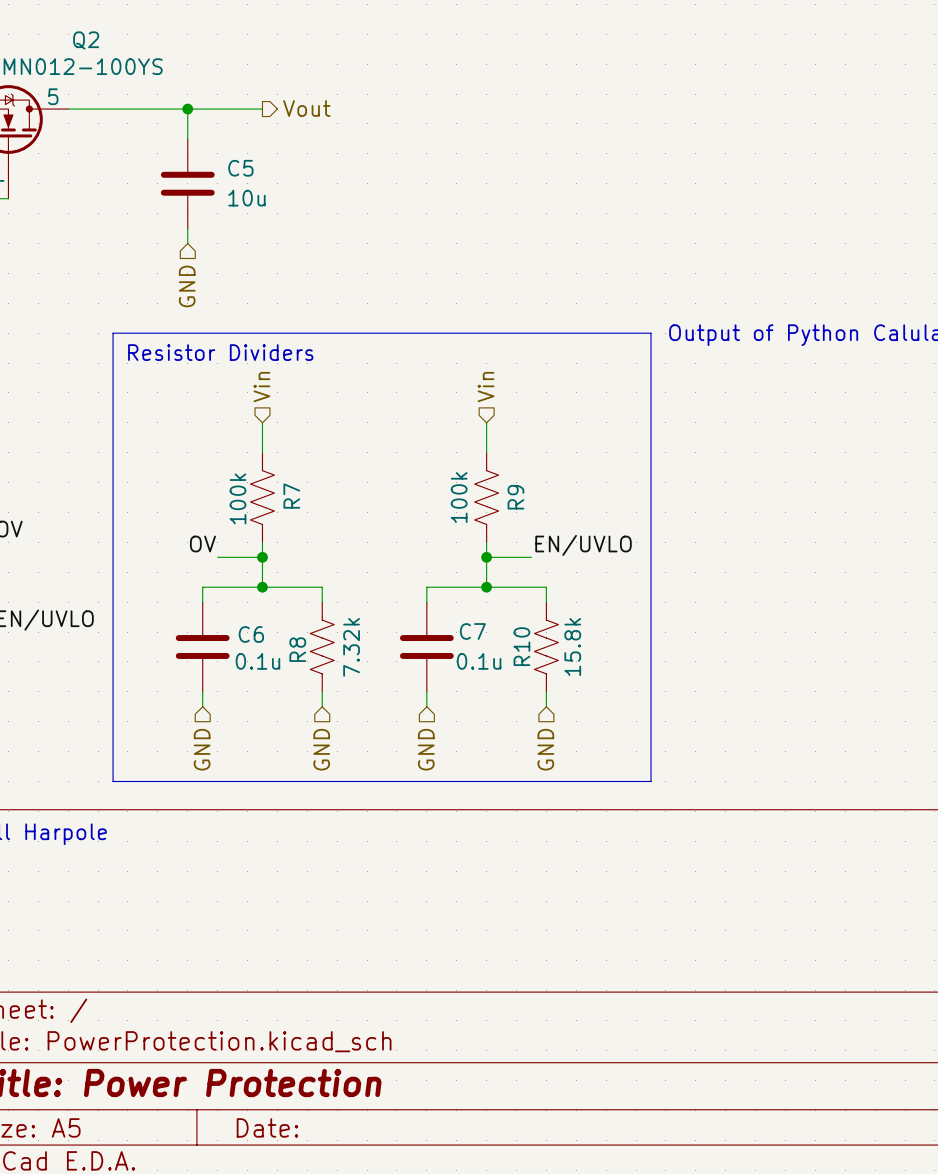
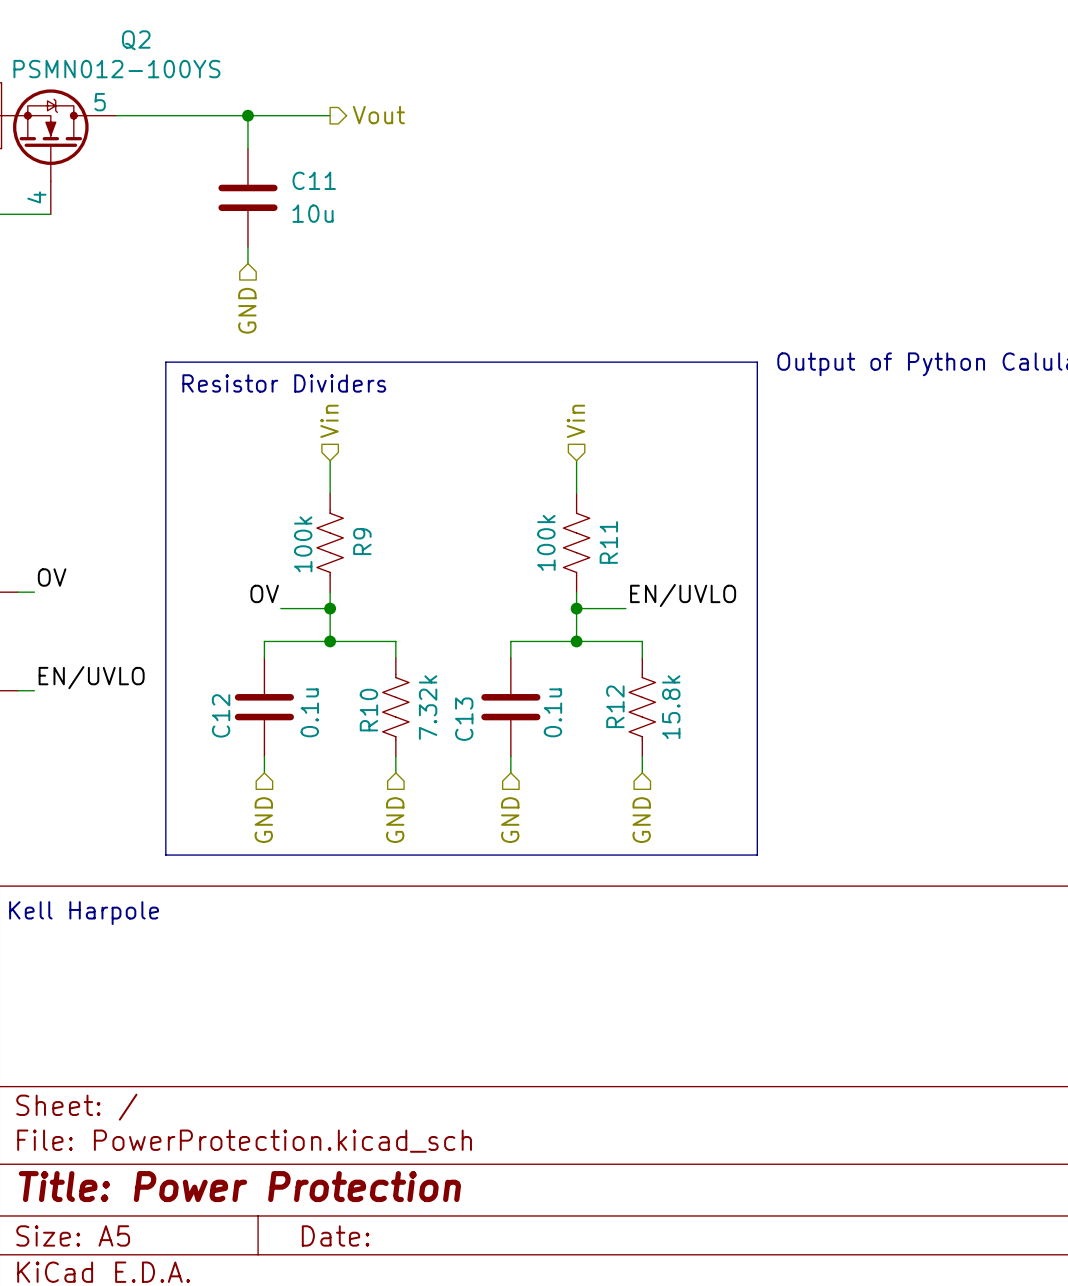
C5 name: C5 (240, 168) -> C11 (314, 180)
R7 name: R7 (291, 496) -> R9 (362, 541)
R9 name: R9 (515, 497) -> R11 (608, 542)
C7 name: C7 (472, 631) -> C13 (464, 719)
C6 name: C6 (251, 634) -> C12 (221, 715)
R10 name: R10 (521, 646) -> R12 (615, 706)
R8 name: R8 (297, 649) -> R10 (368, 710)
C6 value rotation: 0° (257, 661) -> 90° counterclockwise (309, 712)
C7 value rotation: 0° (479, 661) -> 90° counterclockwise (552, 712)

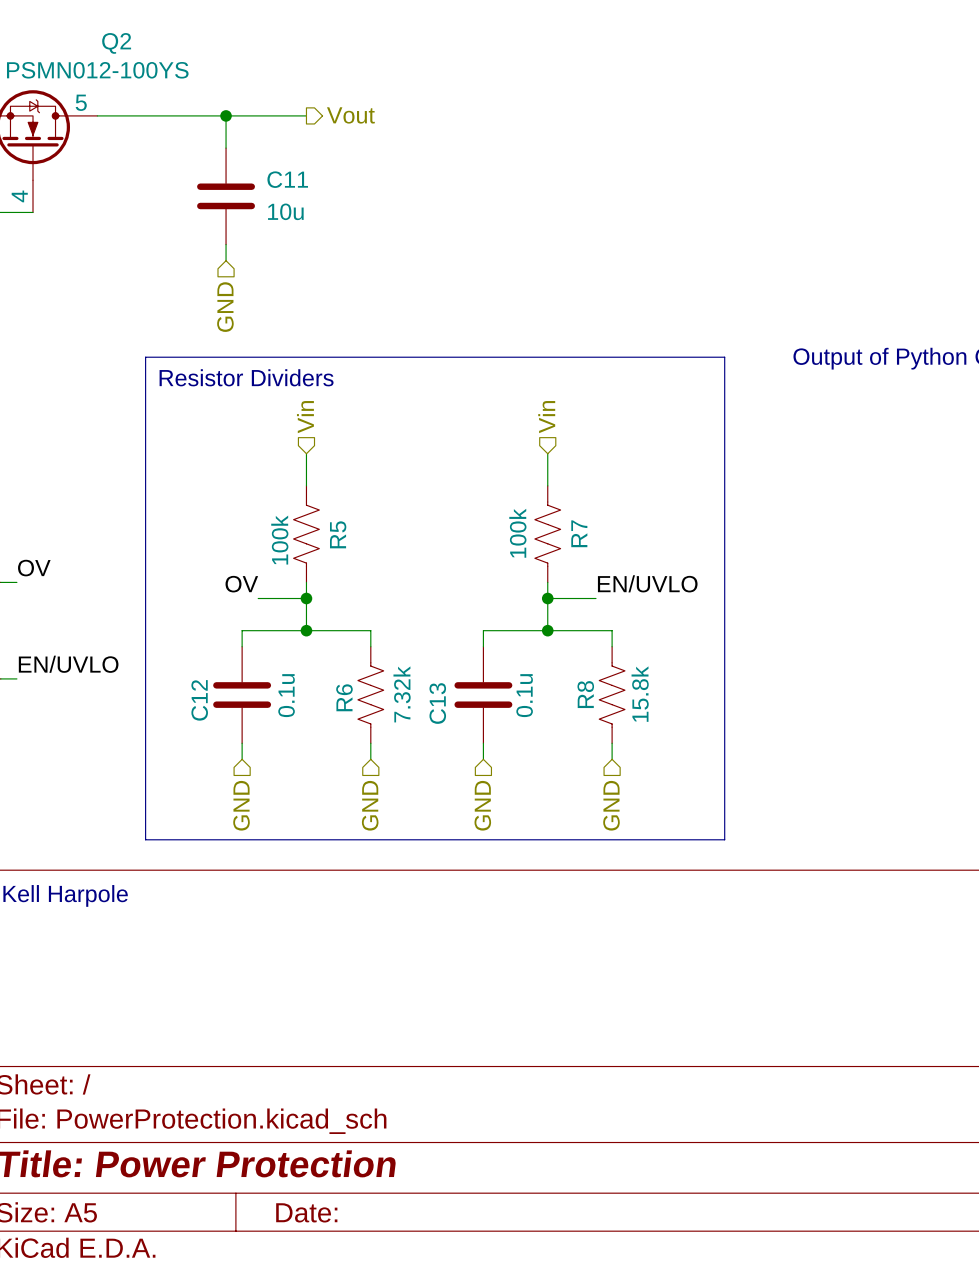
R9 name: R9 (362, 541) -> R5 (338, 534)
R11 name: R11 (608, 542) -> R7 (579, 533)
R12 name: R12 (615, 706) -> R8 (585, 694)
R10 name: R10 (368, 710) -> R6 (344, 697)

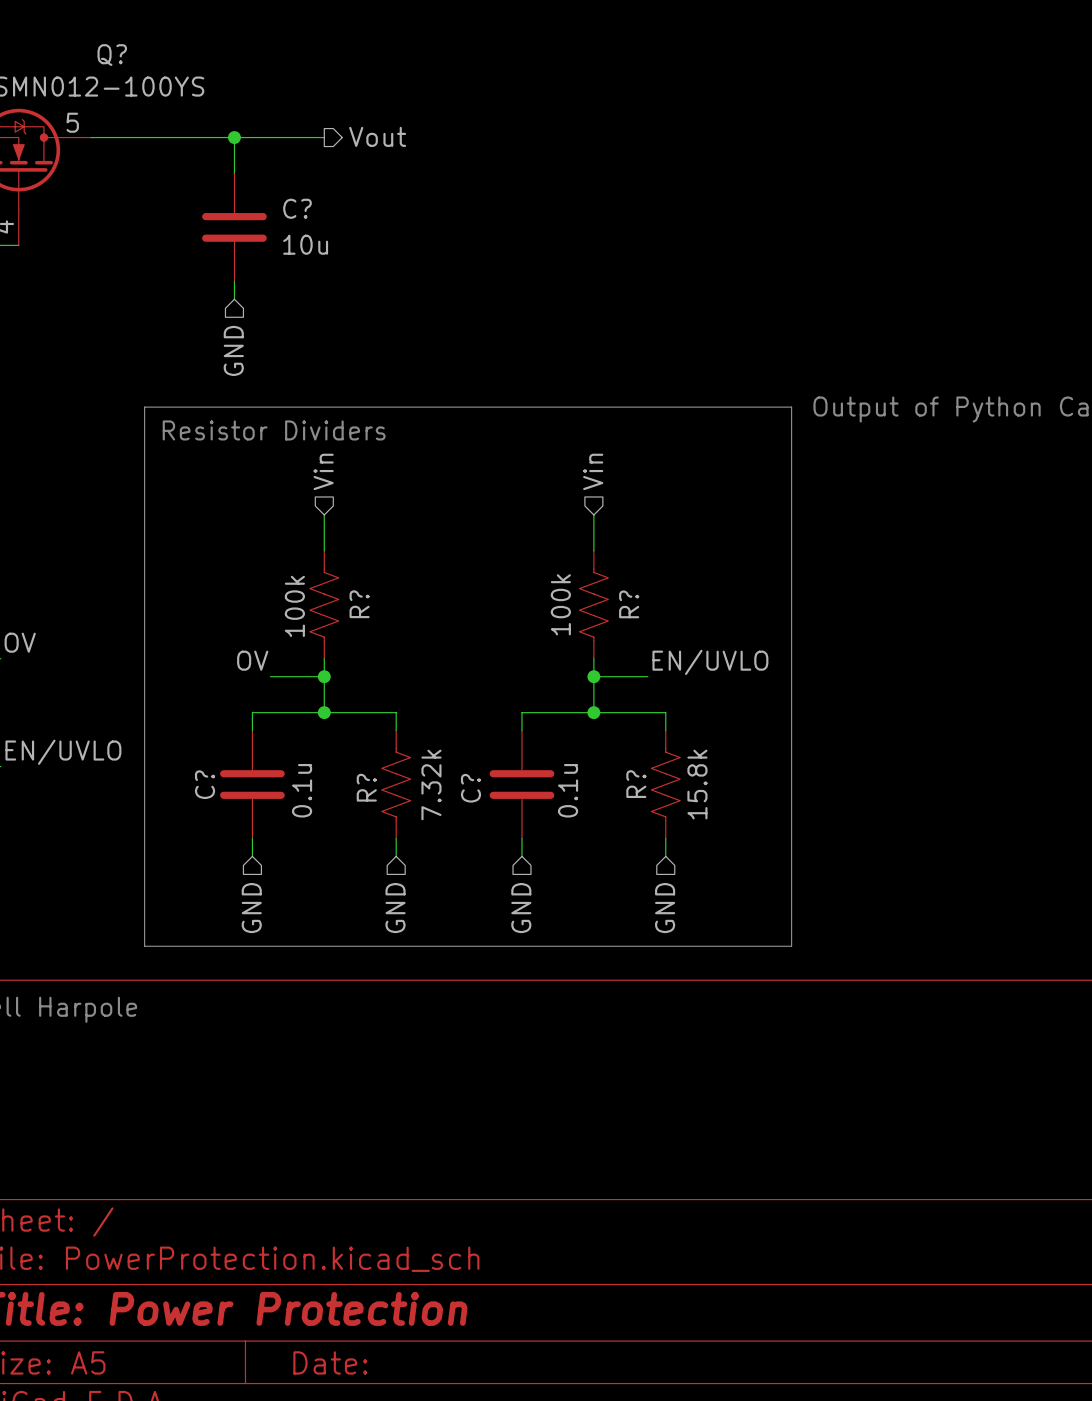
Q2 name: Q2 (116, 43) -> Q? (112, 55)
C11 name: C11 (287, 179) -> C? (297, 208)
R7 name: R7 (579, 533) -> R? (629, 604)
R5 name: R5 (338, 534) -> R? (359, 604)
R8 name: R8 (585, 694) -> R? (636, 784)
R6 name: R6 (344, 697) -> R? (366, 787)
C12 name: C12 (199, 700) -> C? (205, 784)
C13 name: C13 (437, 703) -> C? (471, 788)

